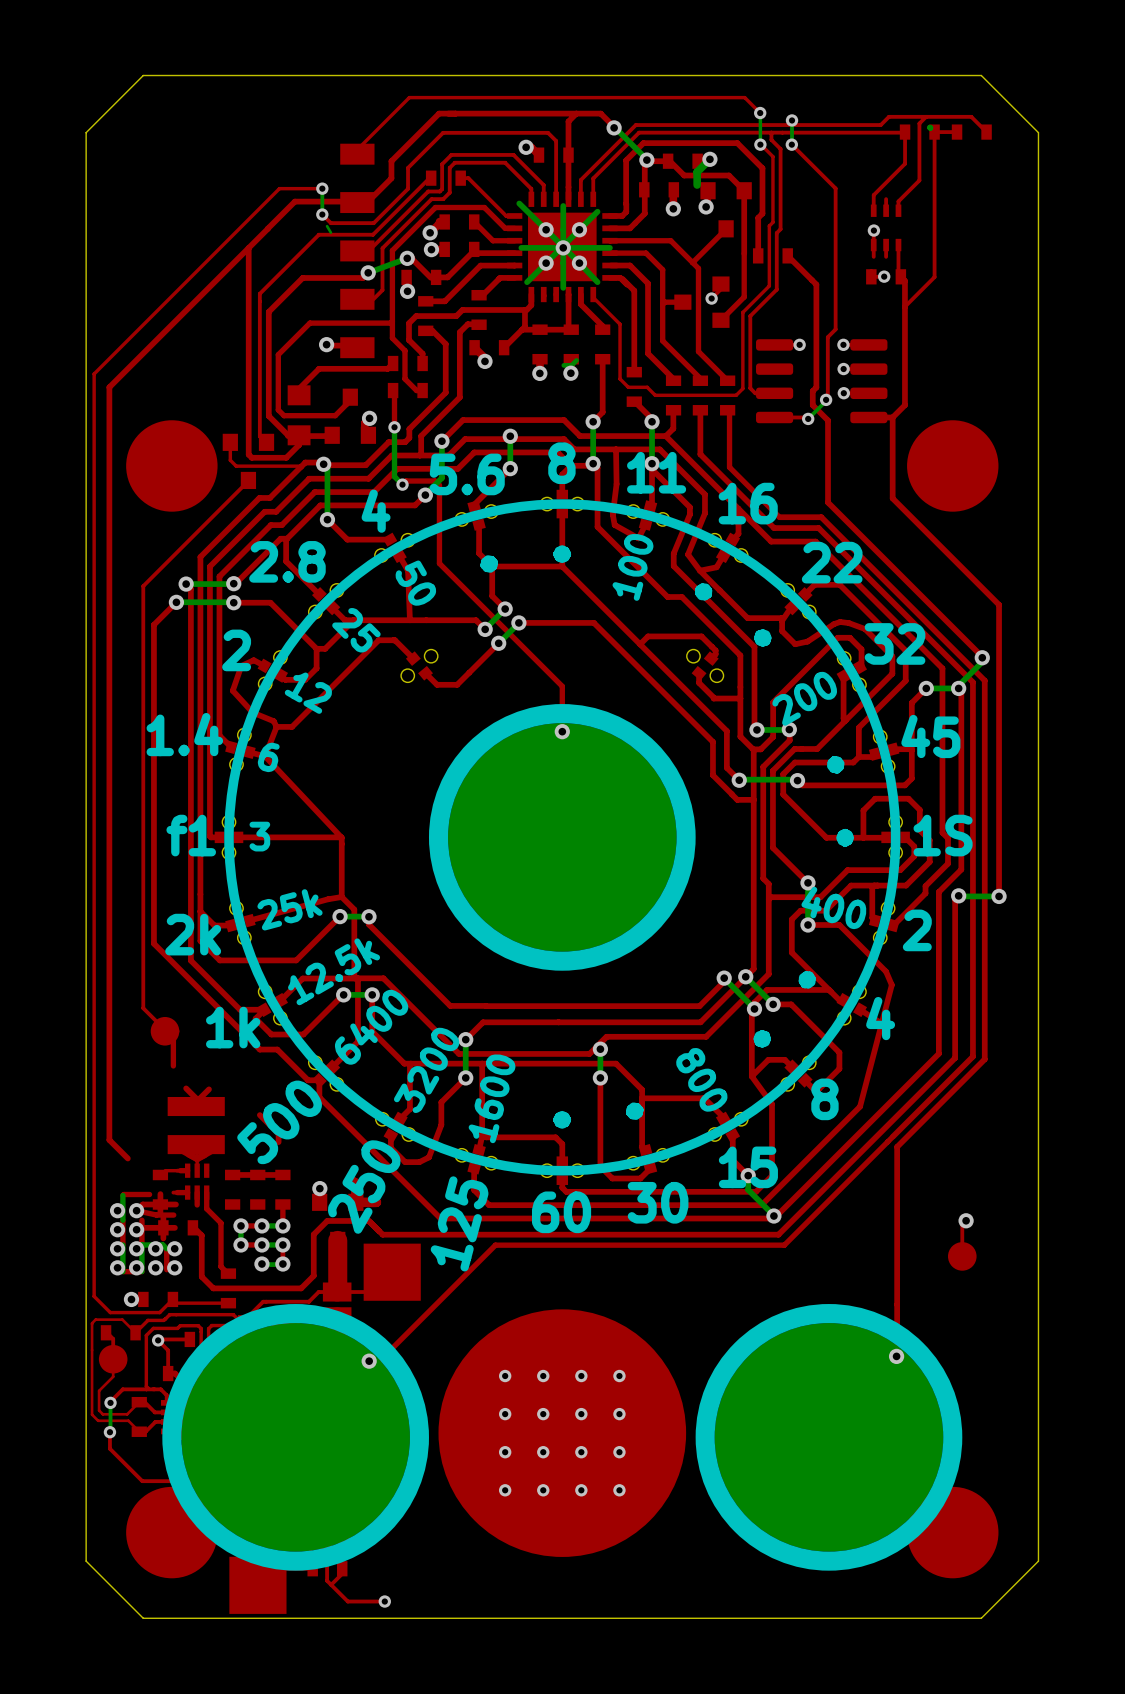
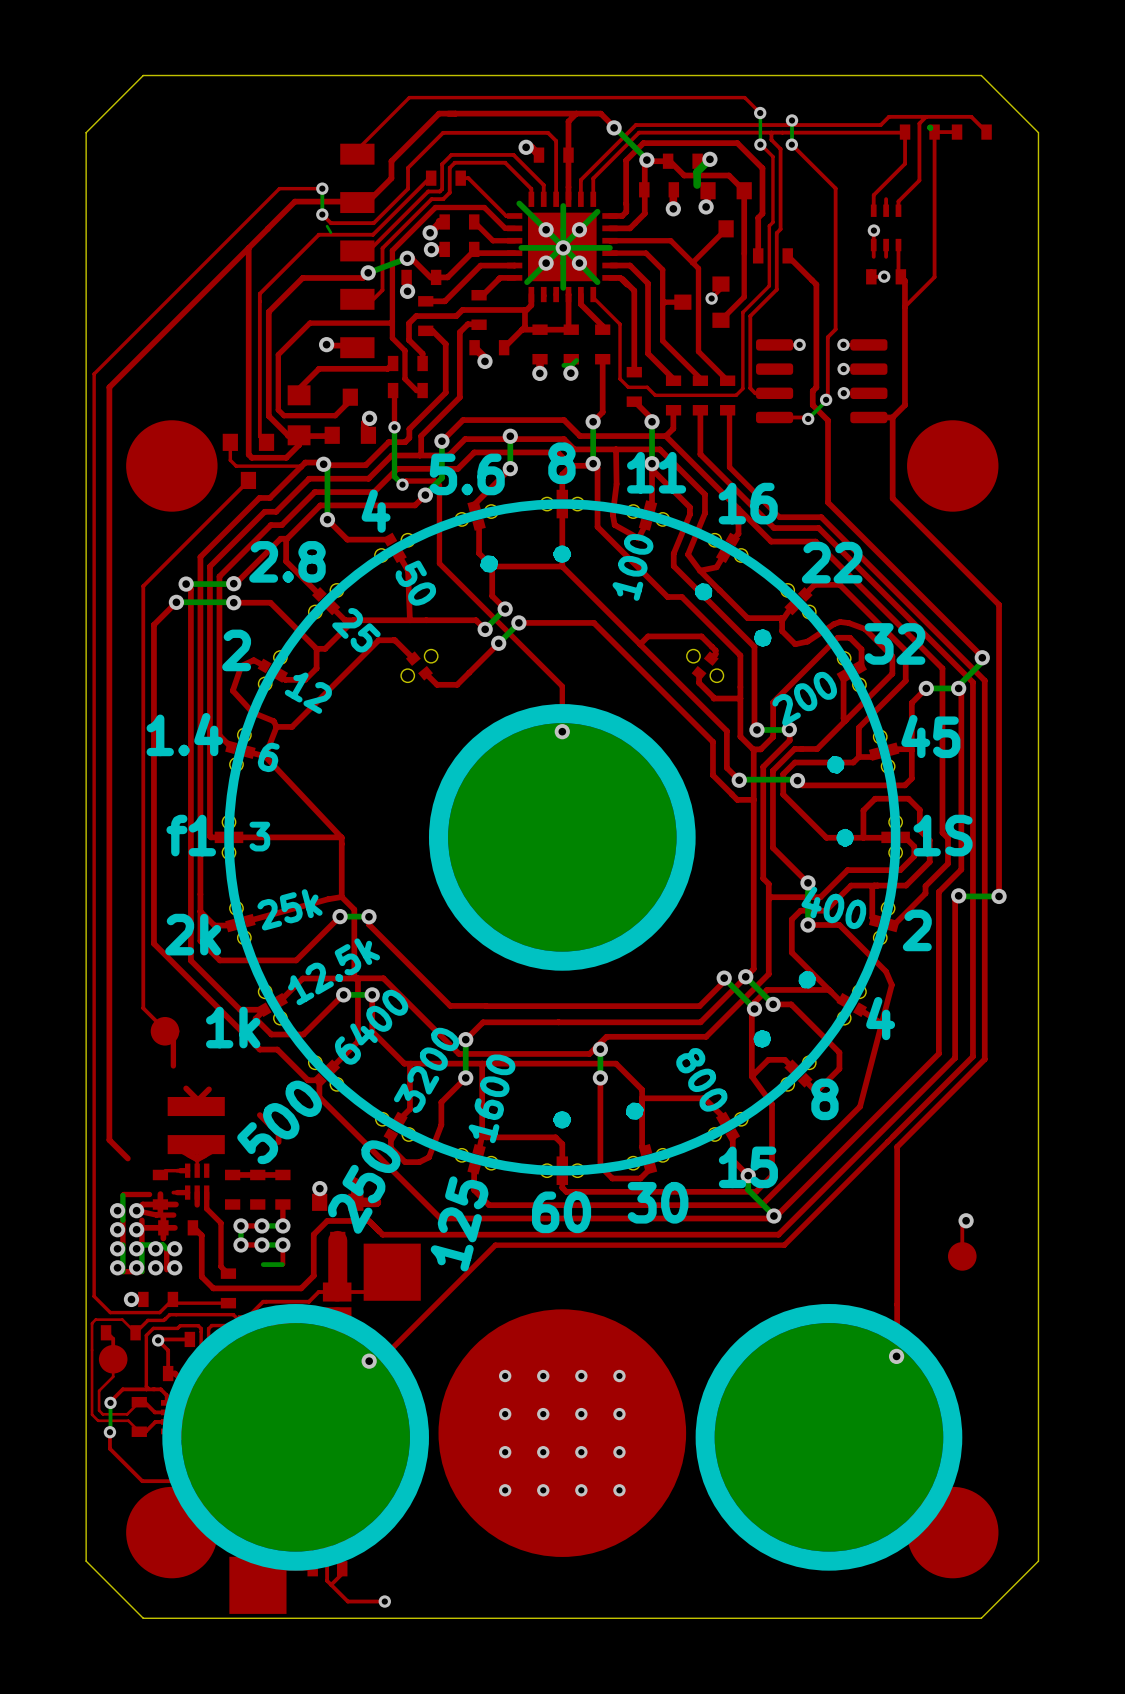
via: (261, 1264) -> none
via: (282, 1264) -> none

